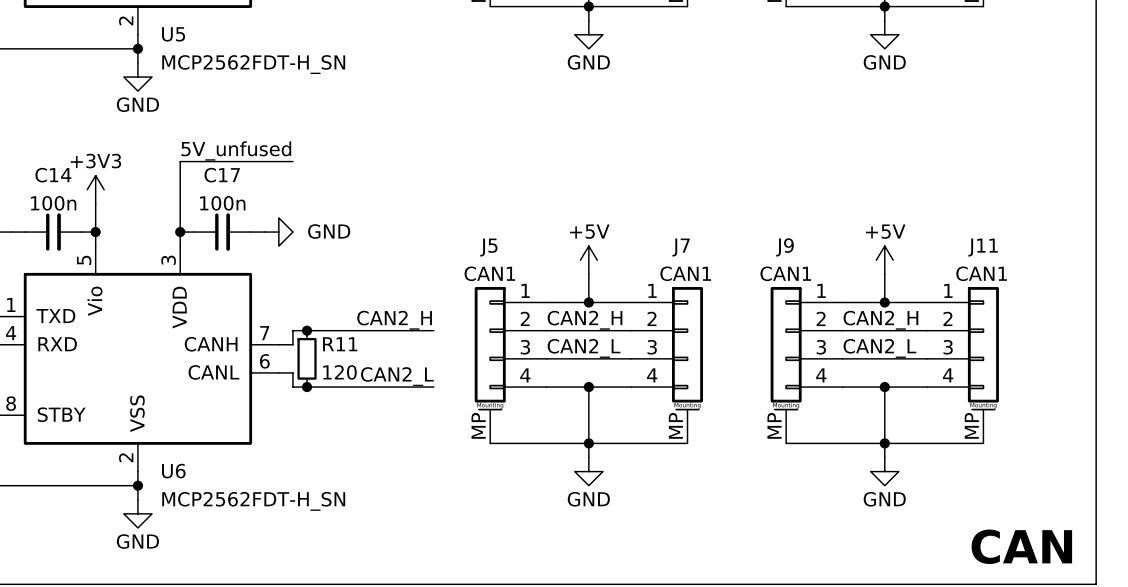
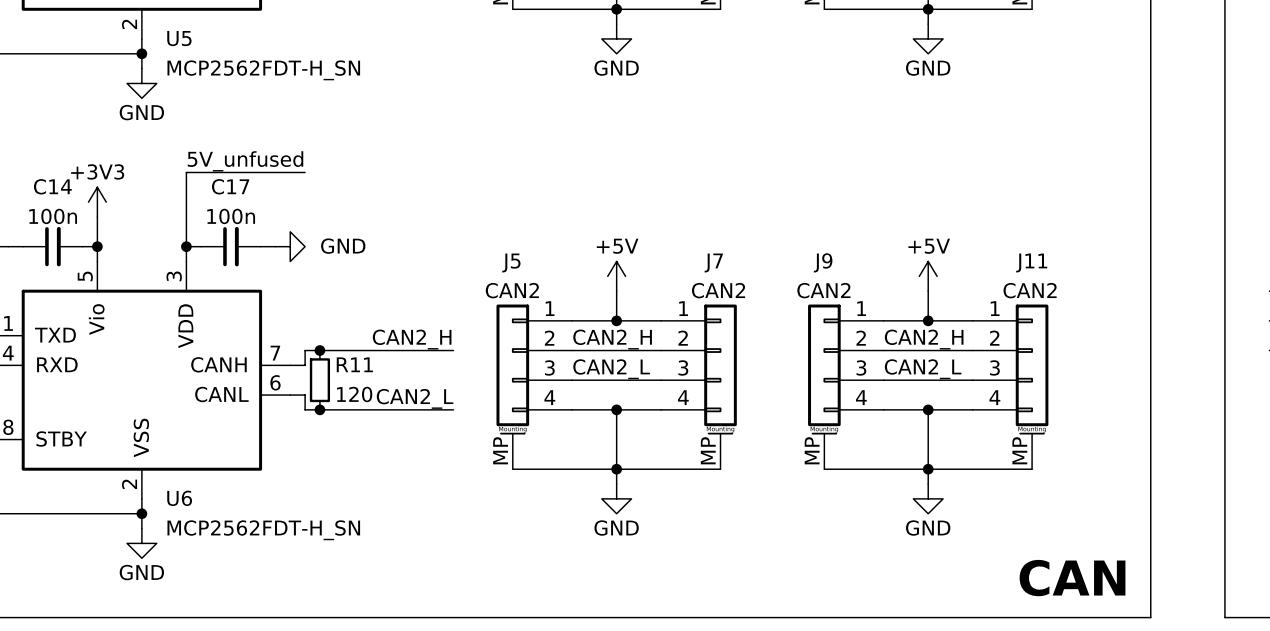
J5 value: CAN1 (489, 273) -> CAN2 (512, 290)
J7 value: CAN1 (685, 273) -> CAN2 (718, 290)
J9 value: CAN1 (785, 273) -> CAN2 (823, 290)
J11 value: CAN1 (981, 273) -> CAN2 (1030, 290)

